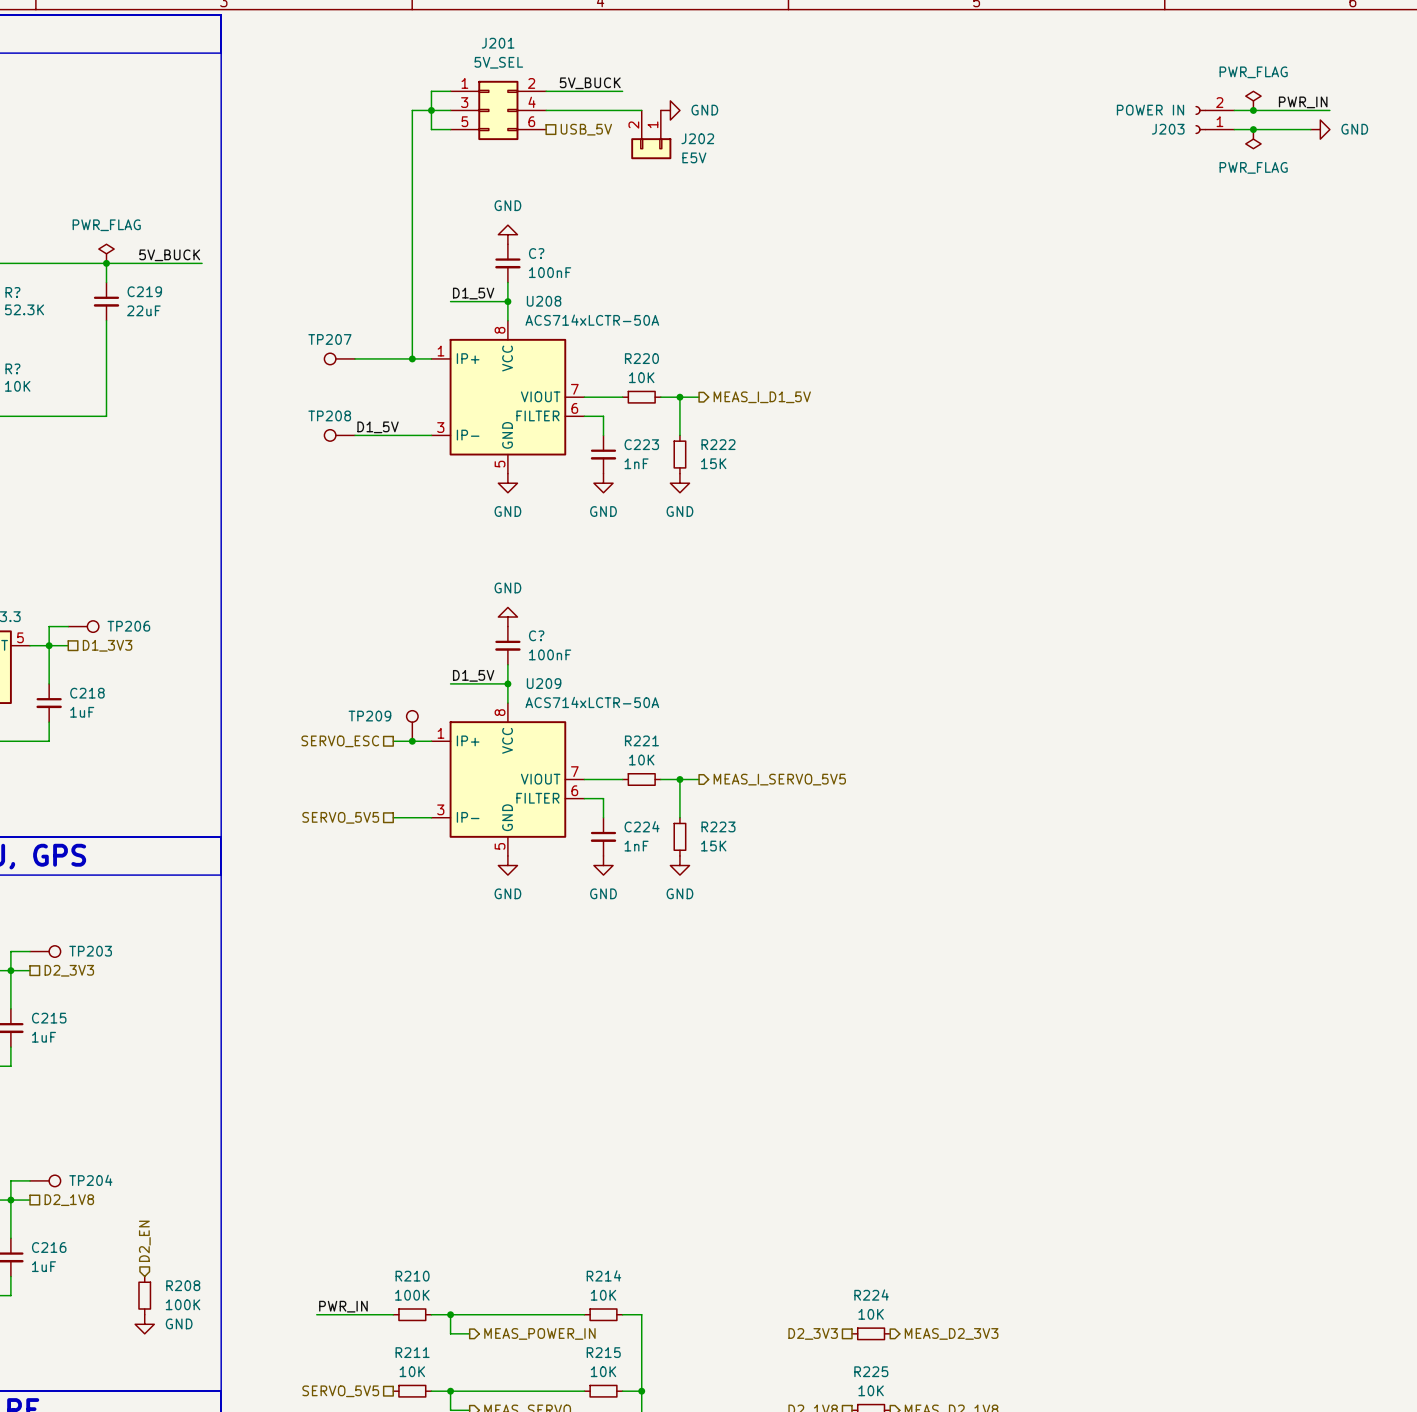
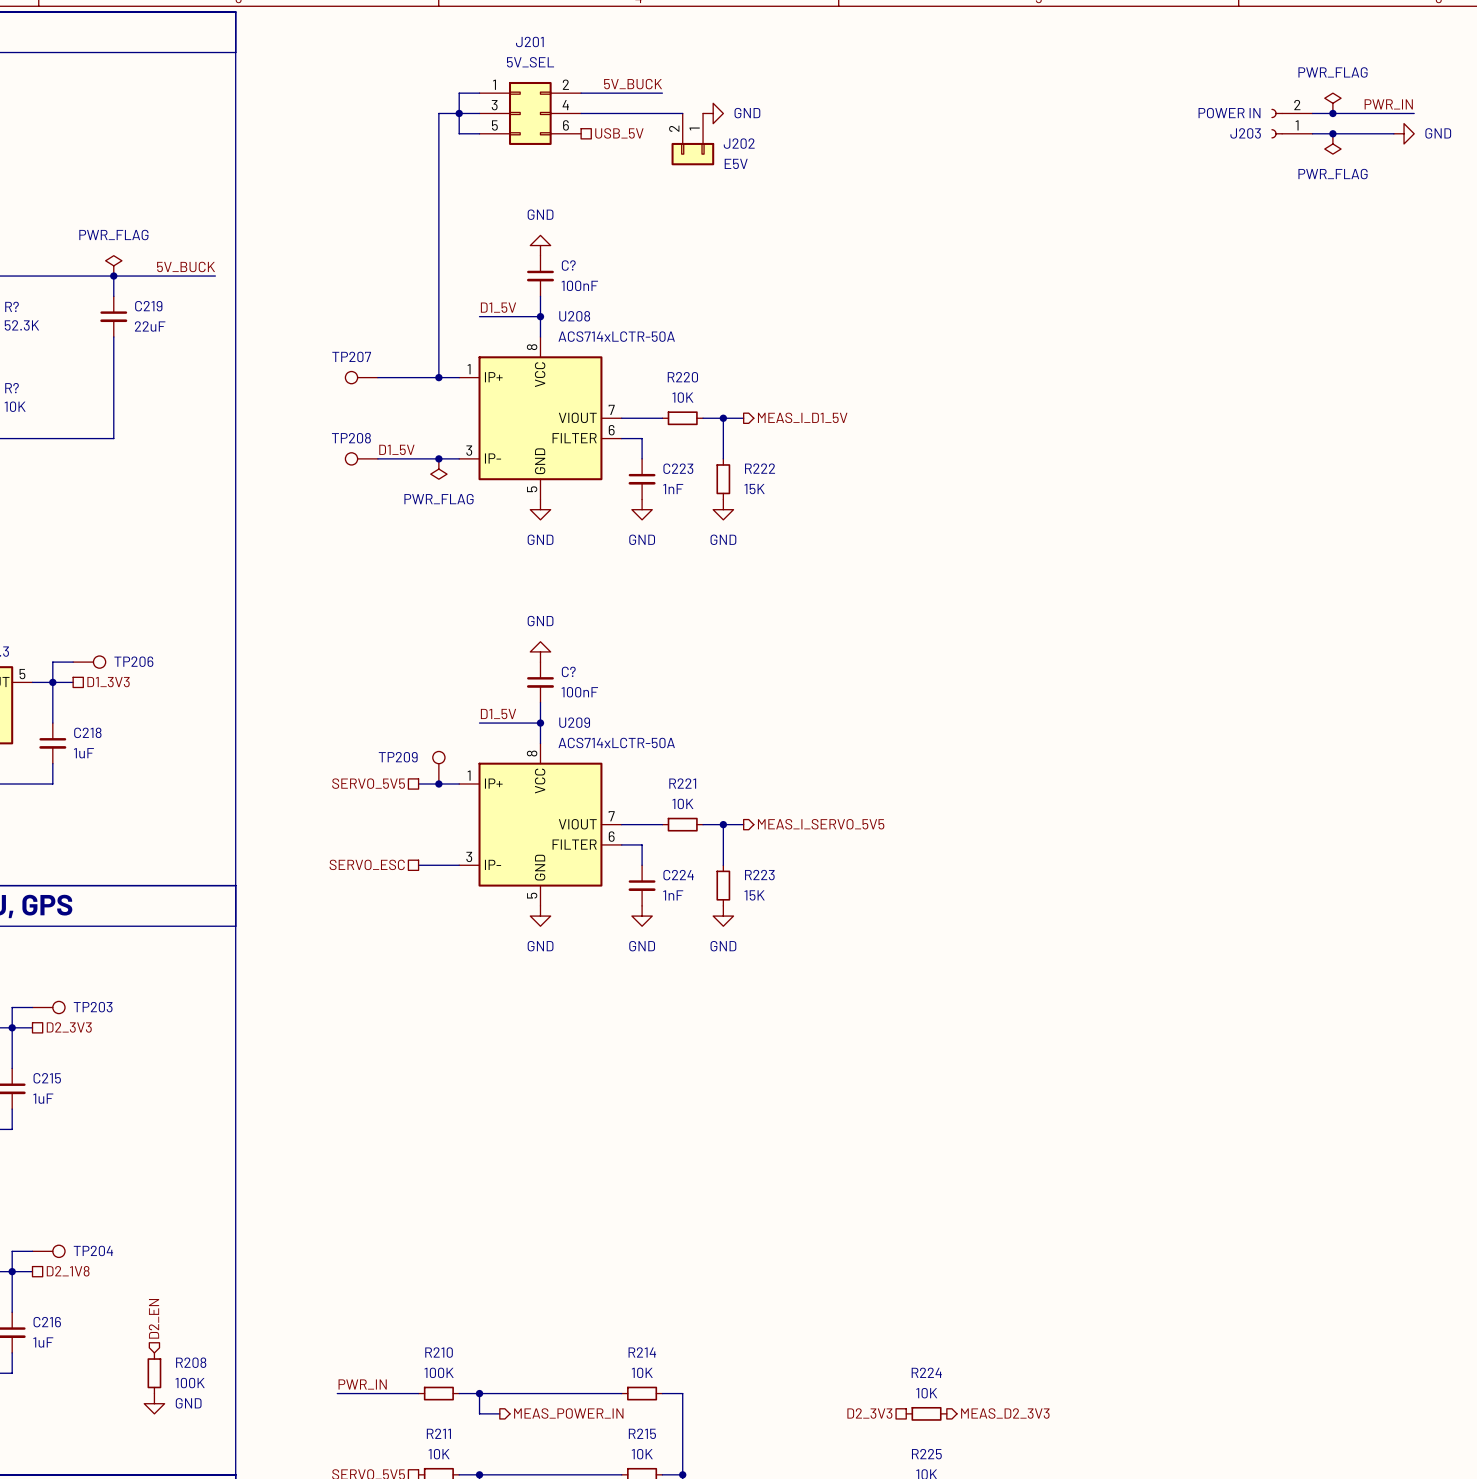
junction: none -> (438, 458)
power symbol: none -> PWR_FLAG (438, 469)
hierarchical label: SERVO_ESC (340, 741) -> SERVO_5V5 (368, 783)
hierarchical label: SERVO_5V5 (340, 817) -> SERVO_ESC (367, 864)

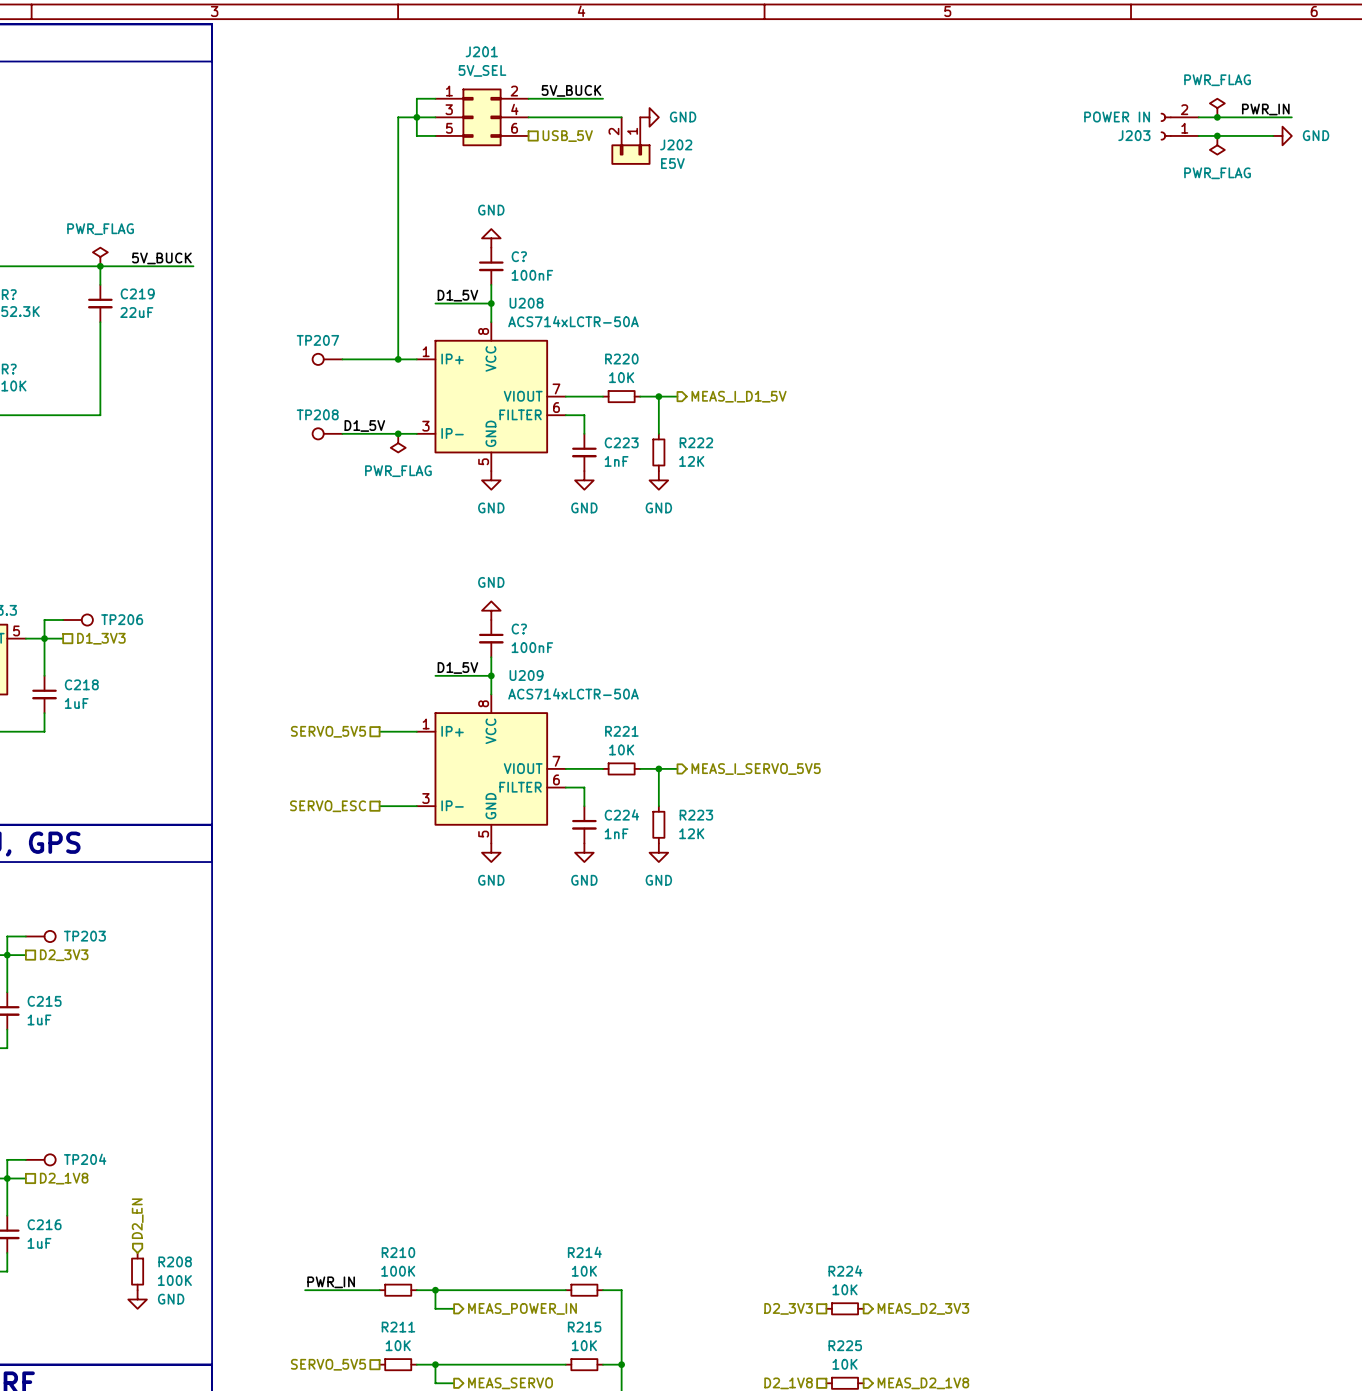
R222 value: 15K (754, 489) -> 12K (691, 461)
TP209: (438, 767) -> none
junction: (438, 783) -> none
R223 value: 15K (754, 895) -> 12K (691, 833)

